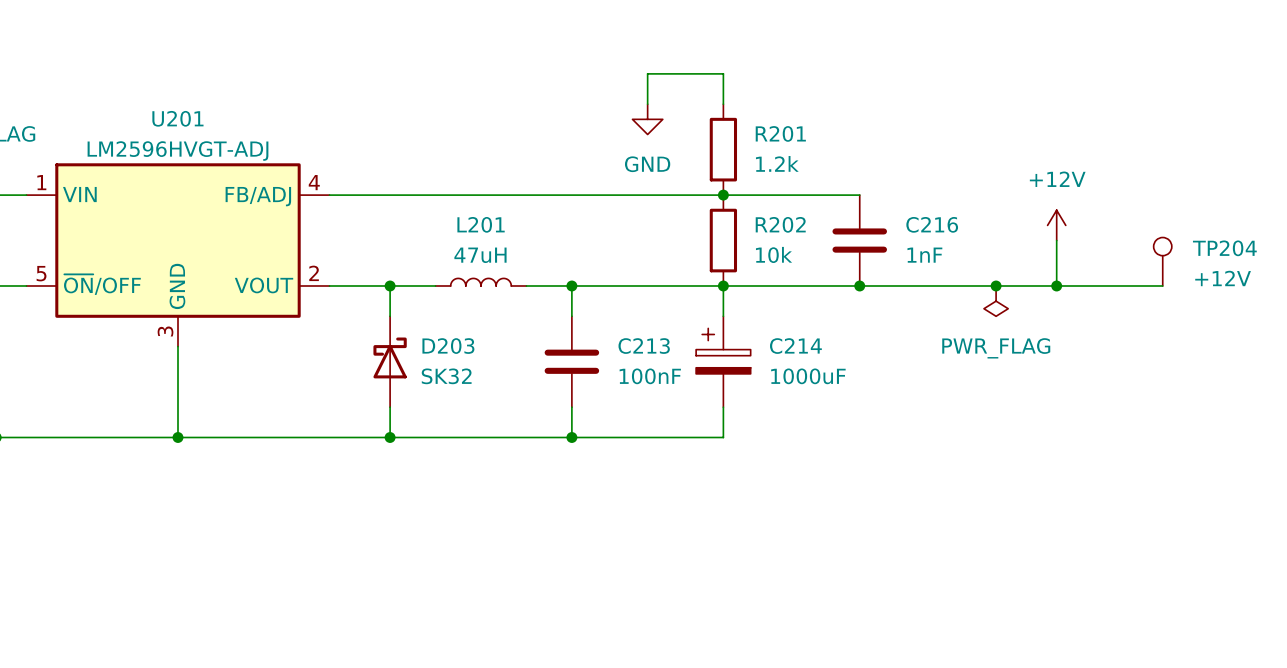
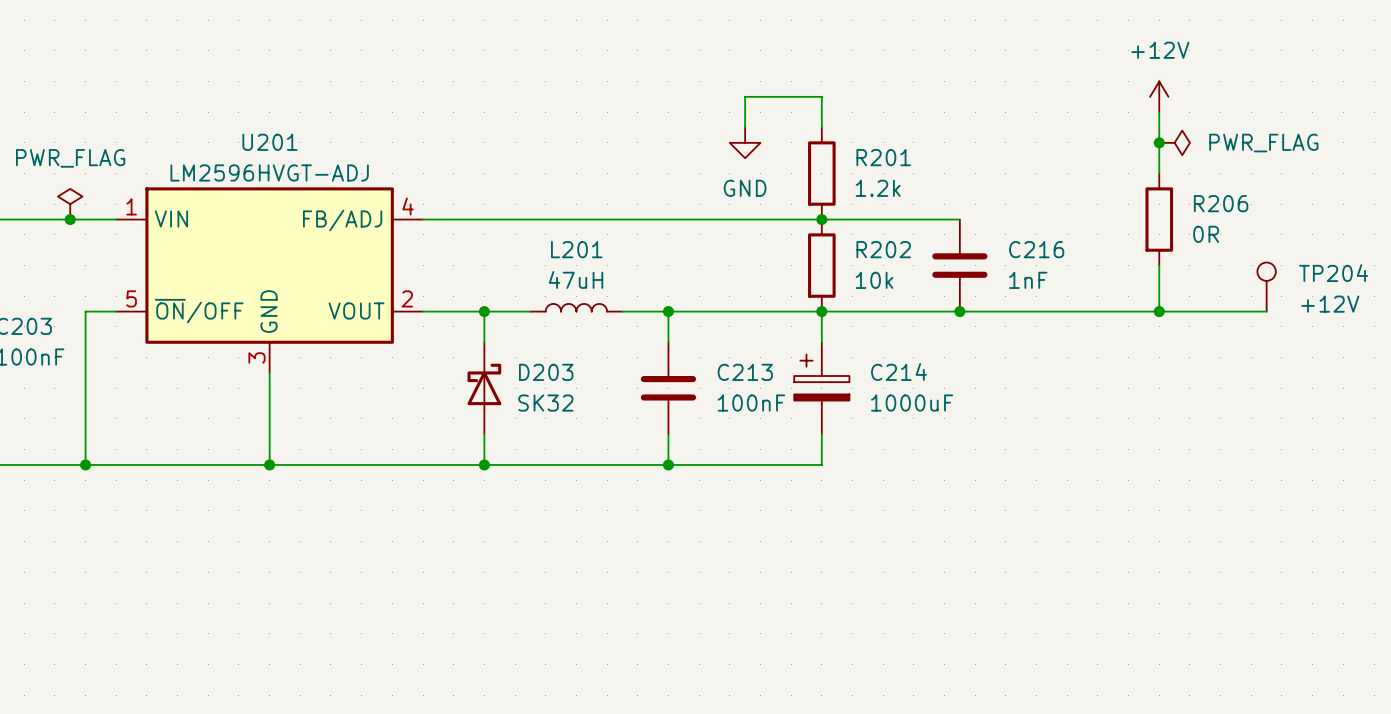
wire: none -> (1159, 112) (1159, 173)
junction: none -> (1159, 142)
R206: none -> 0R (1159, 219)
power symbol position: +12V (1056, 225) -> +12V (1159, 96)
junction: (996, 286) -> none
power symbol rotation: 0° (996, 301) -> 90° counterclockwise (1174, 142)
power symbol position: PWR_FLAG (996, 301) -> PWR_FLAG (1174, 142)
power symbol text position: PWR_FLAG (996, 348) -> PWR_FLAG (1263, 143)

